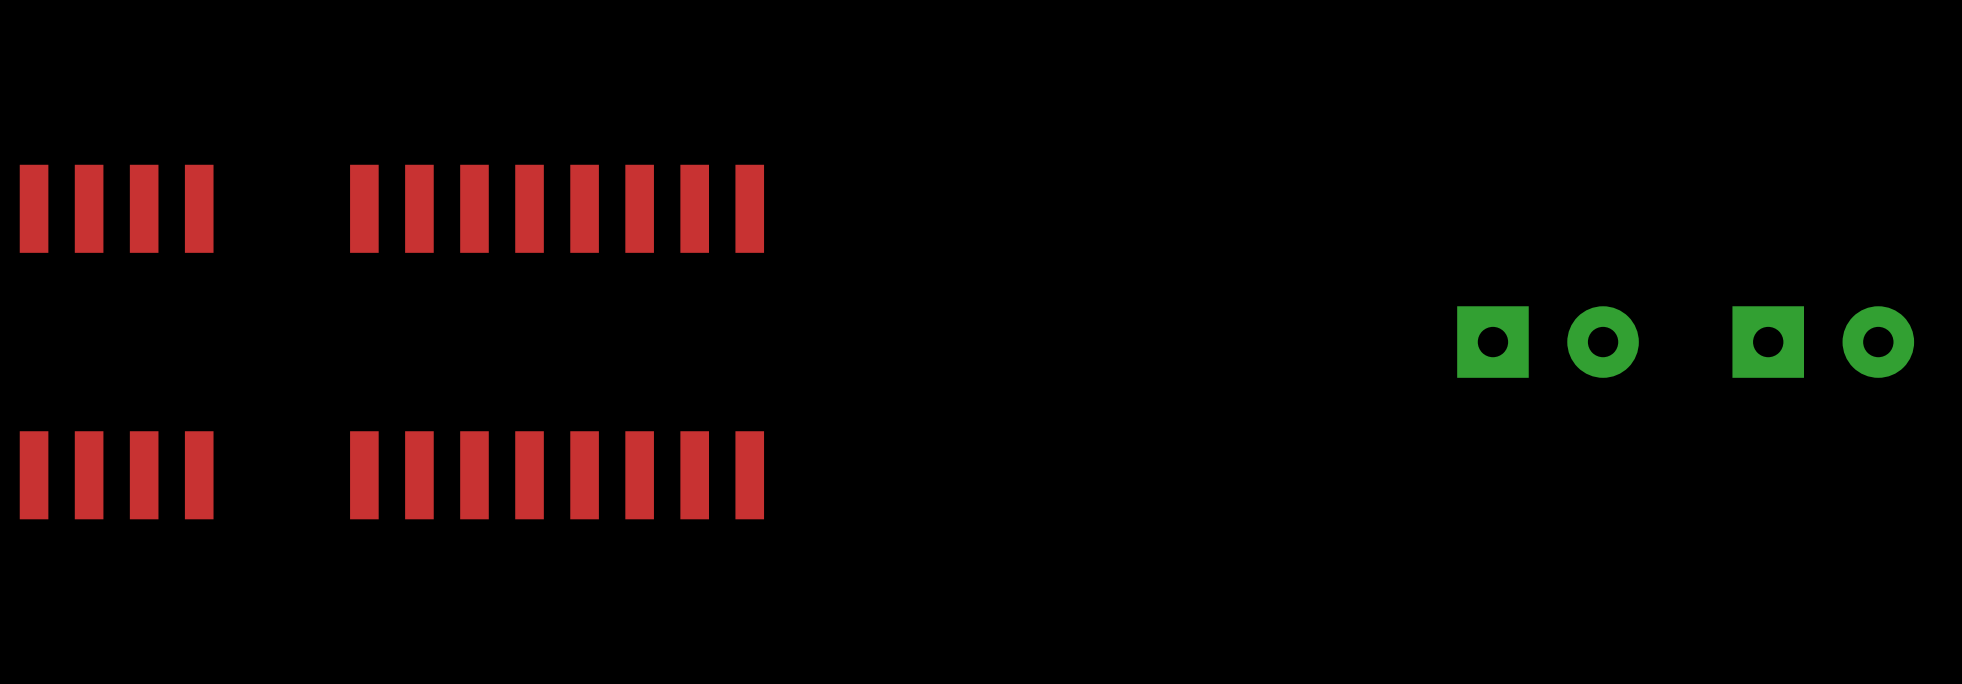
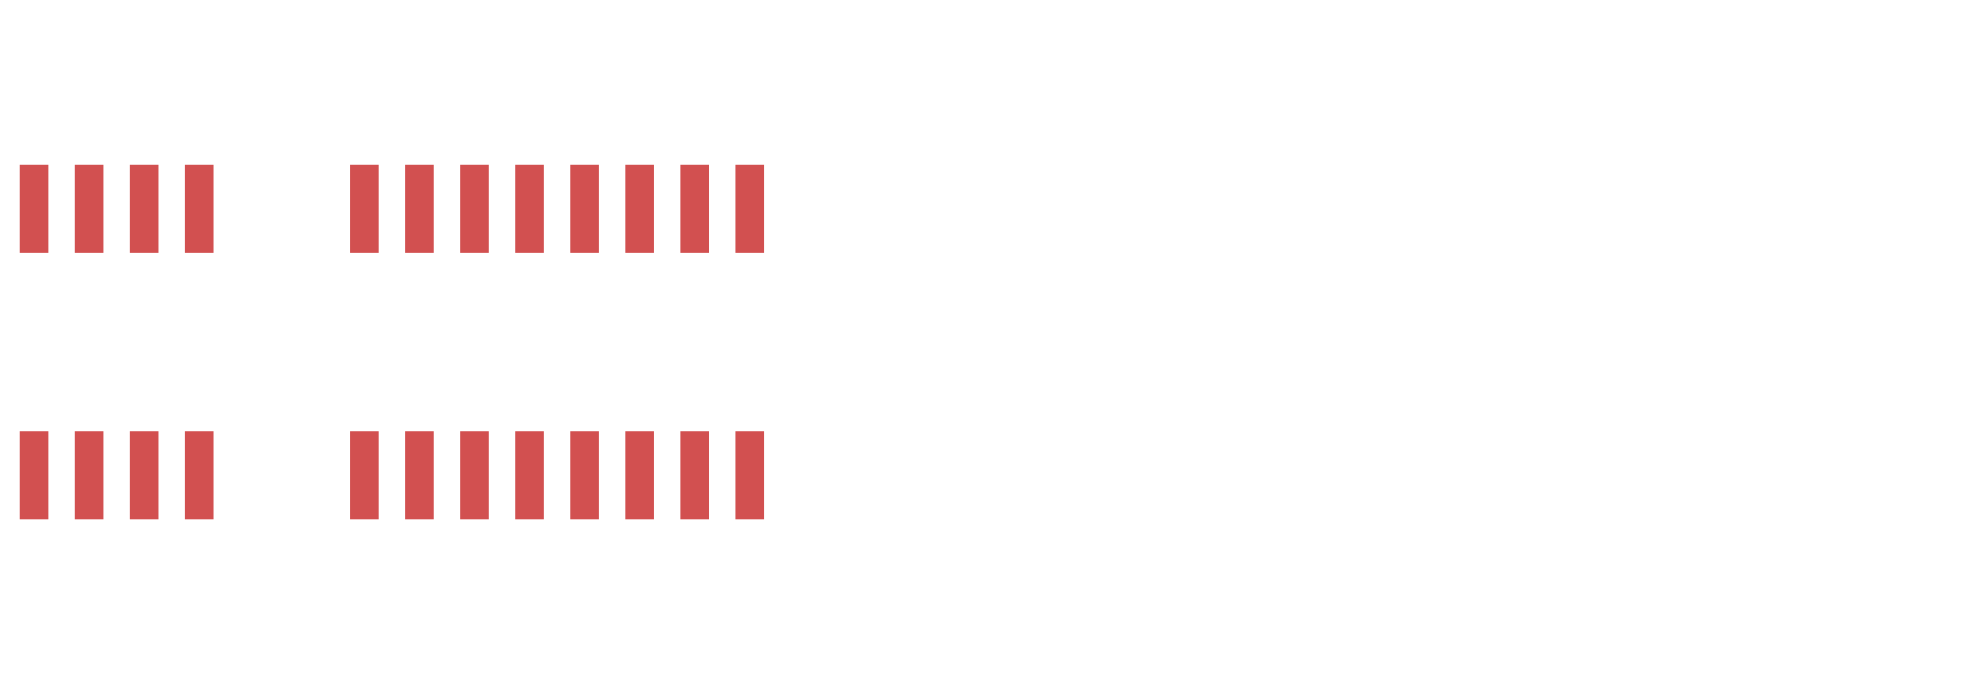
part: (1548, 342) -> none
part: (1823, 342) -> none

